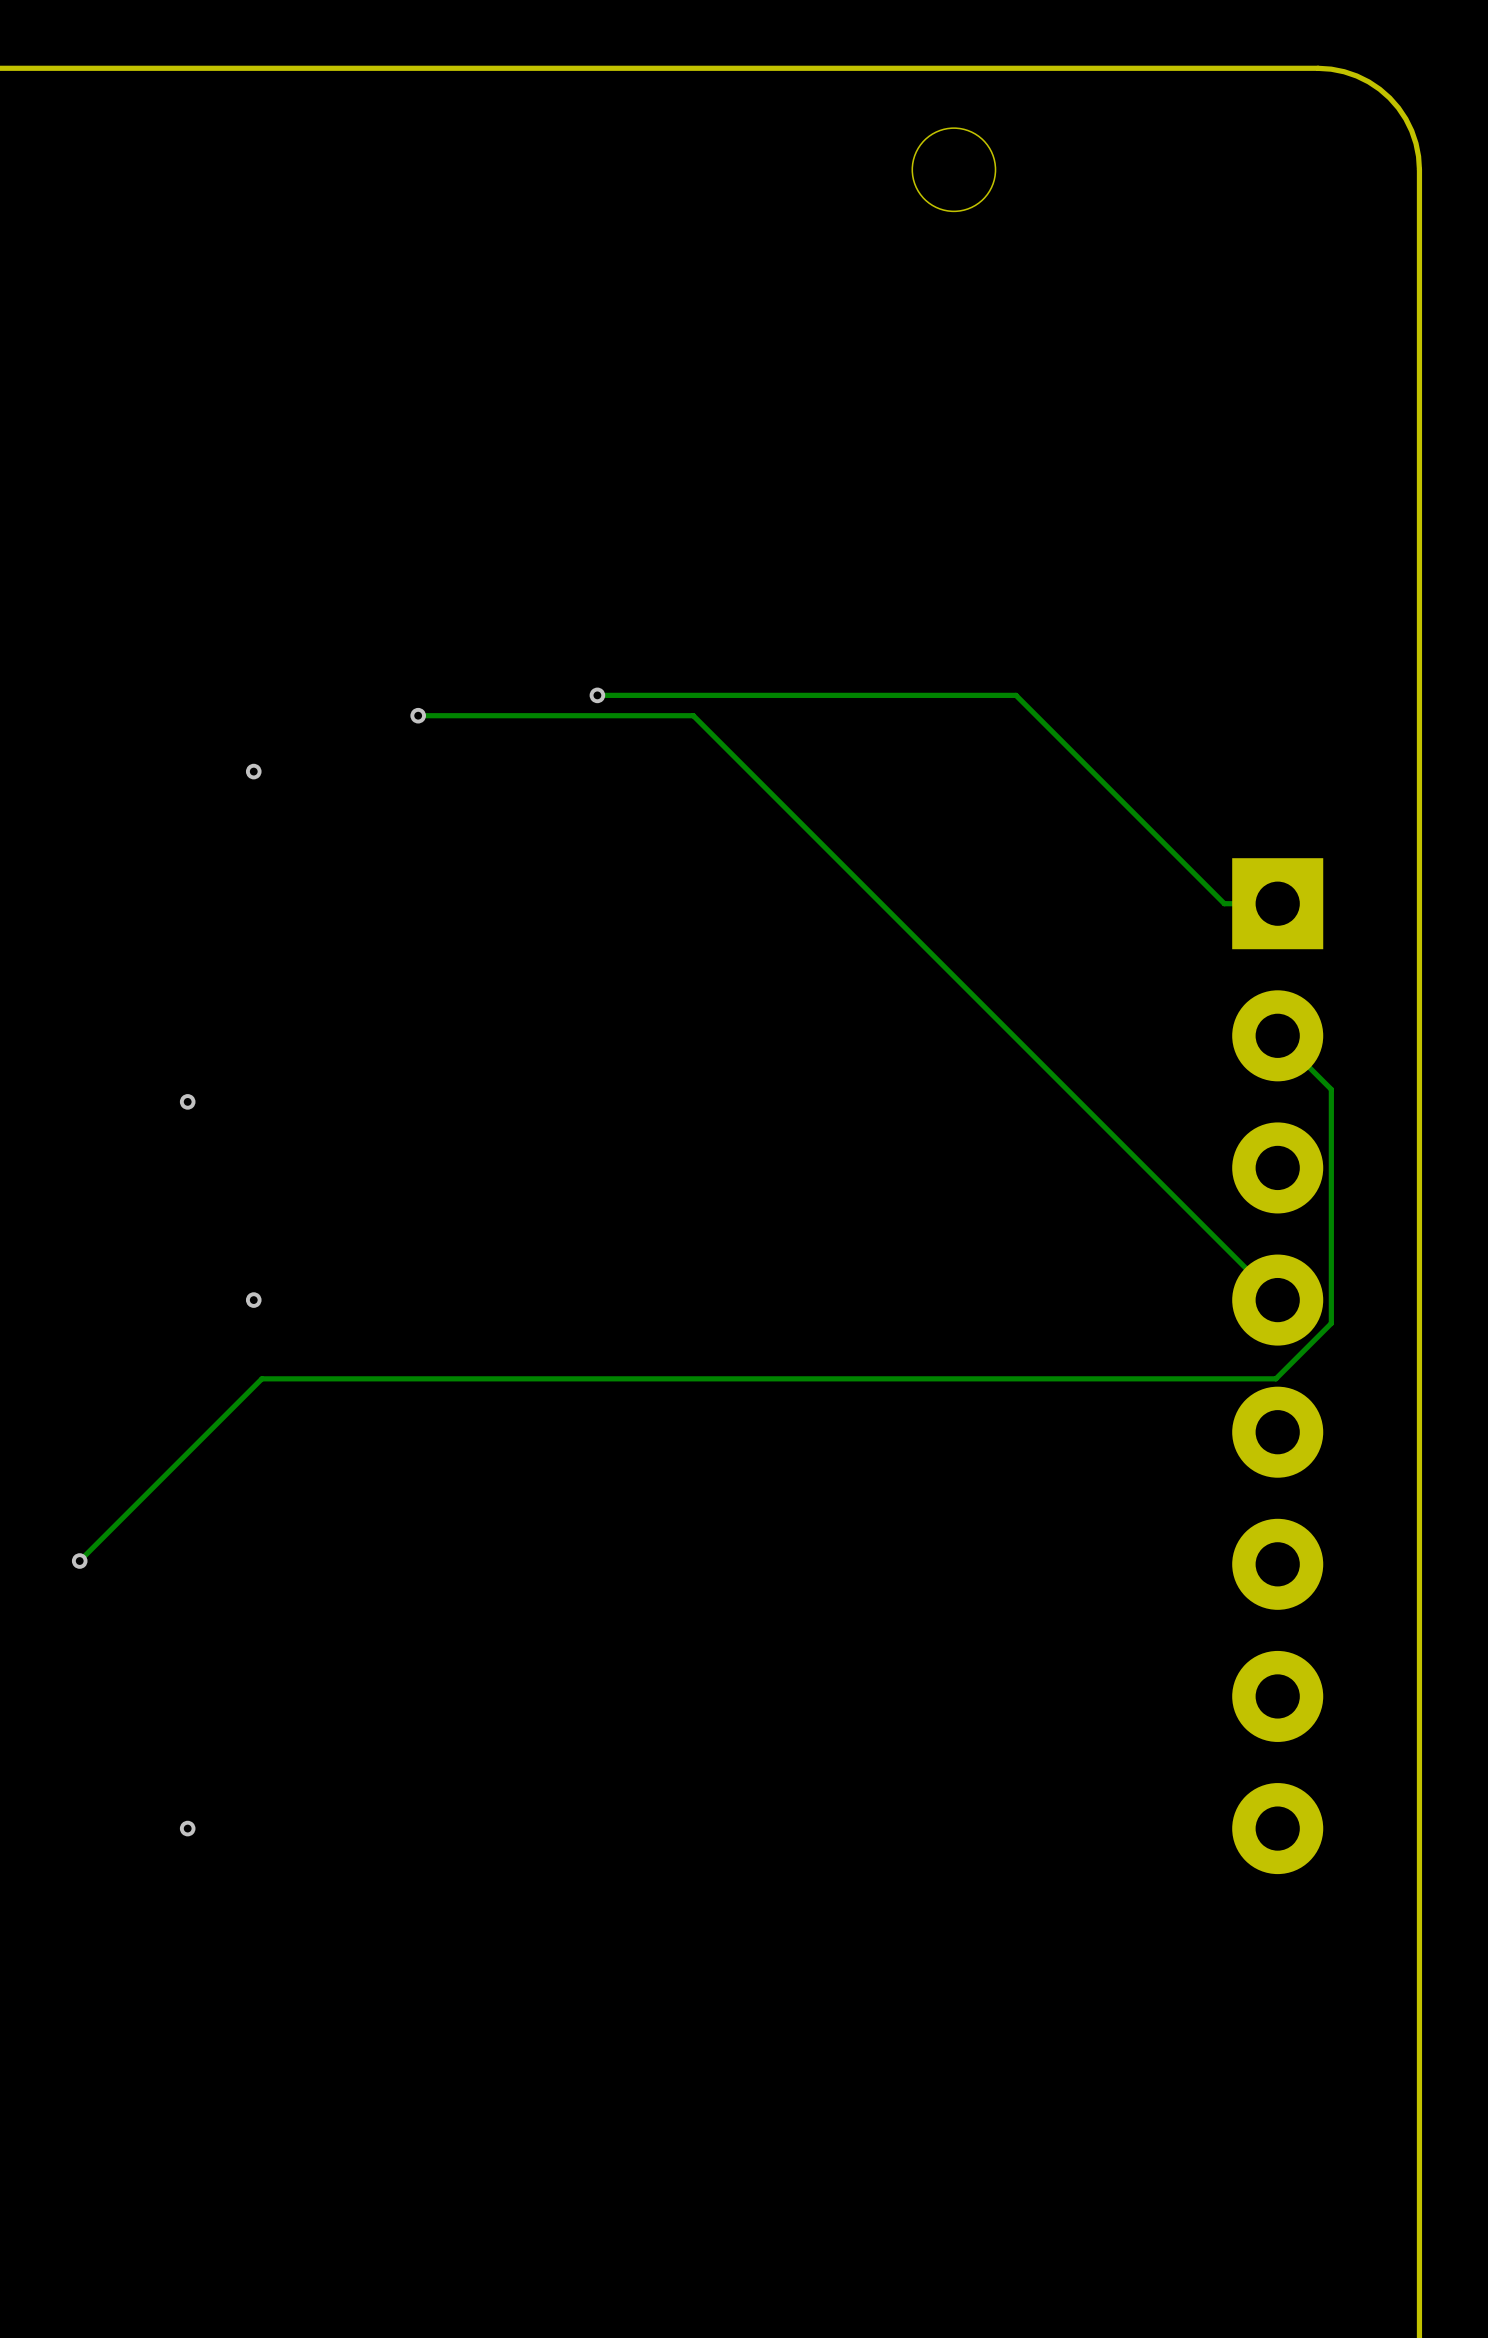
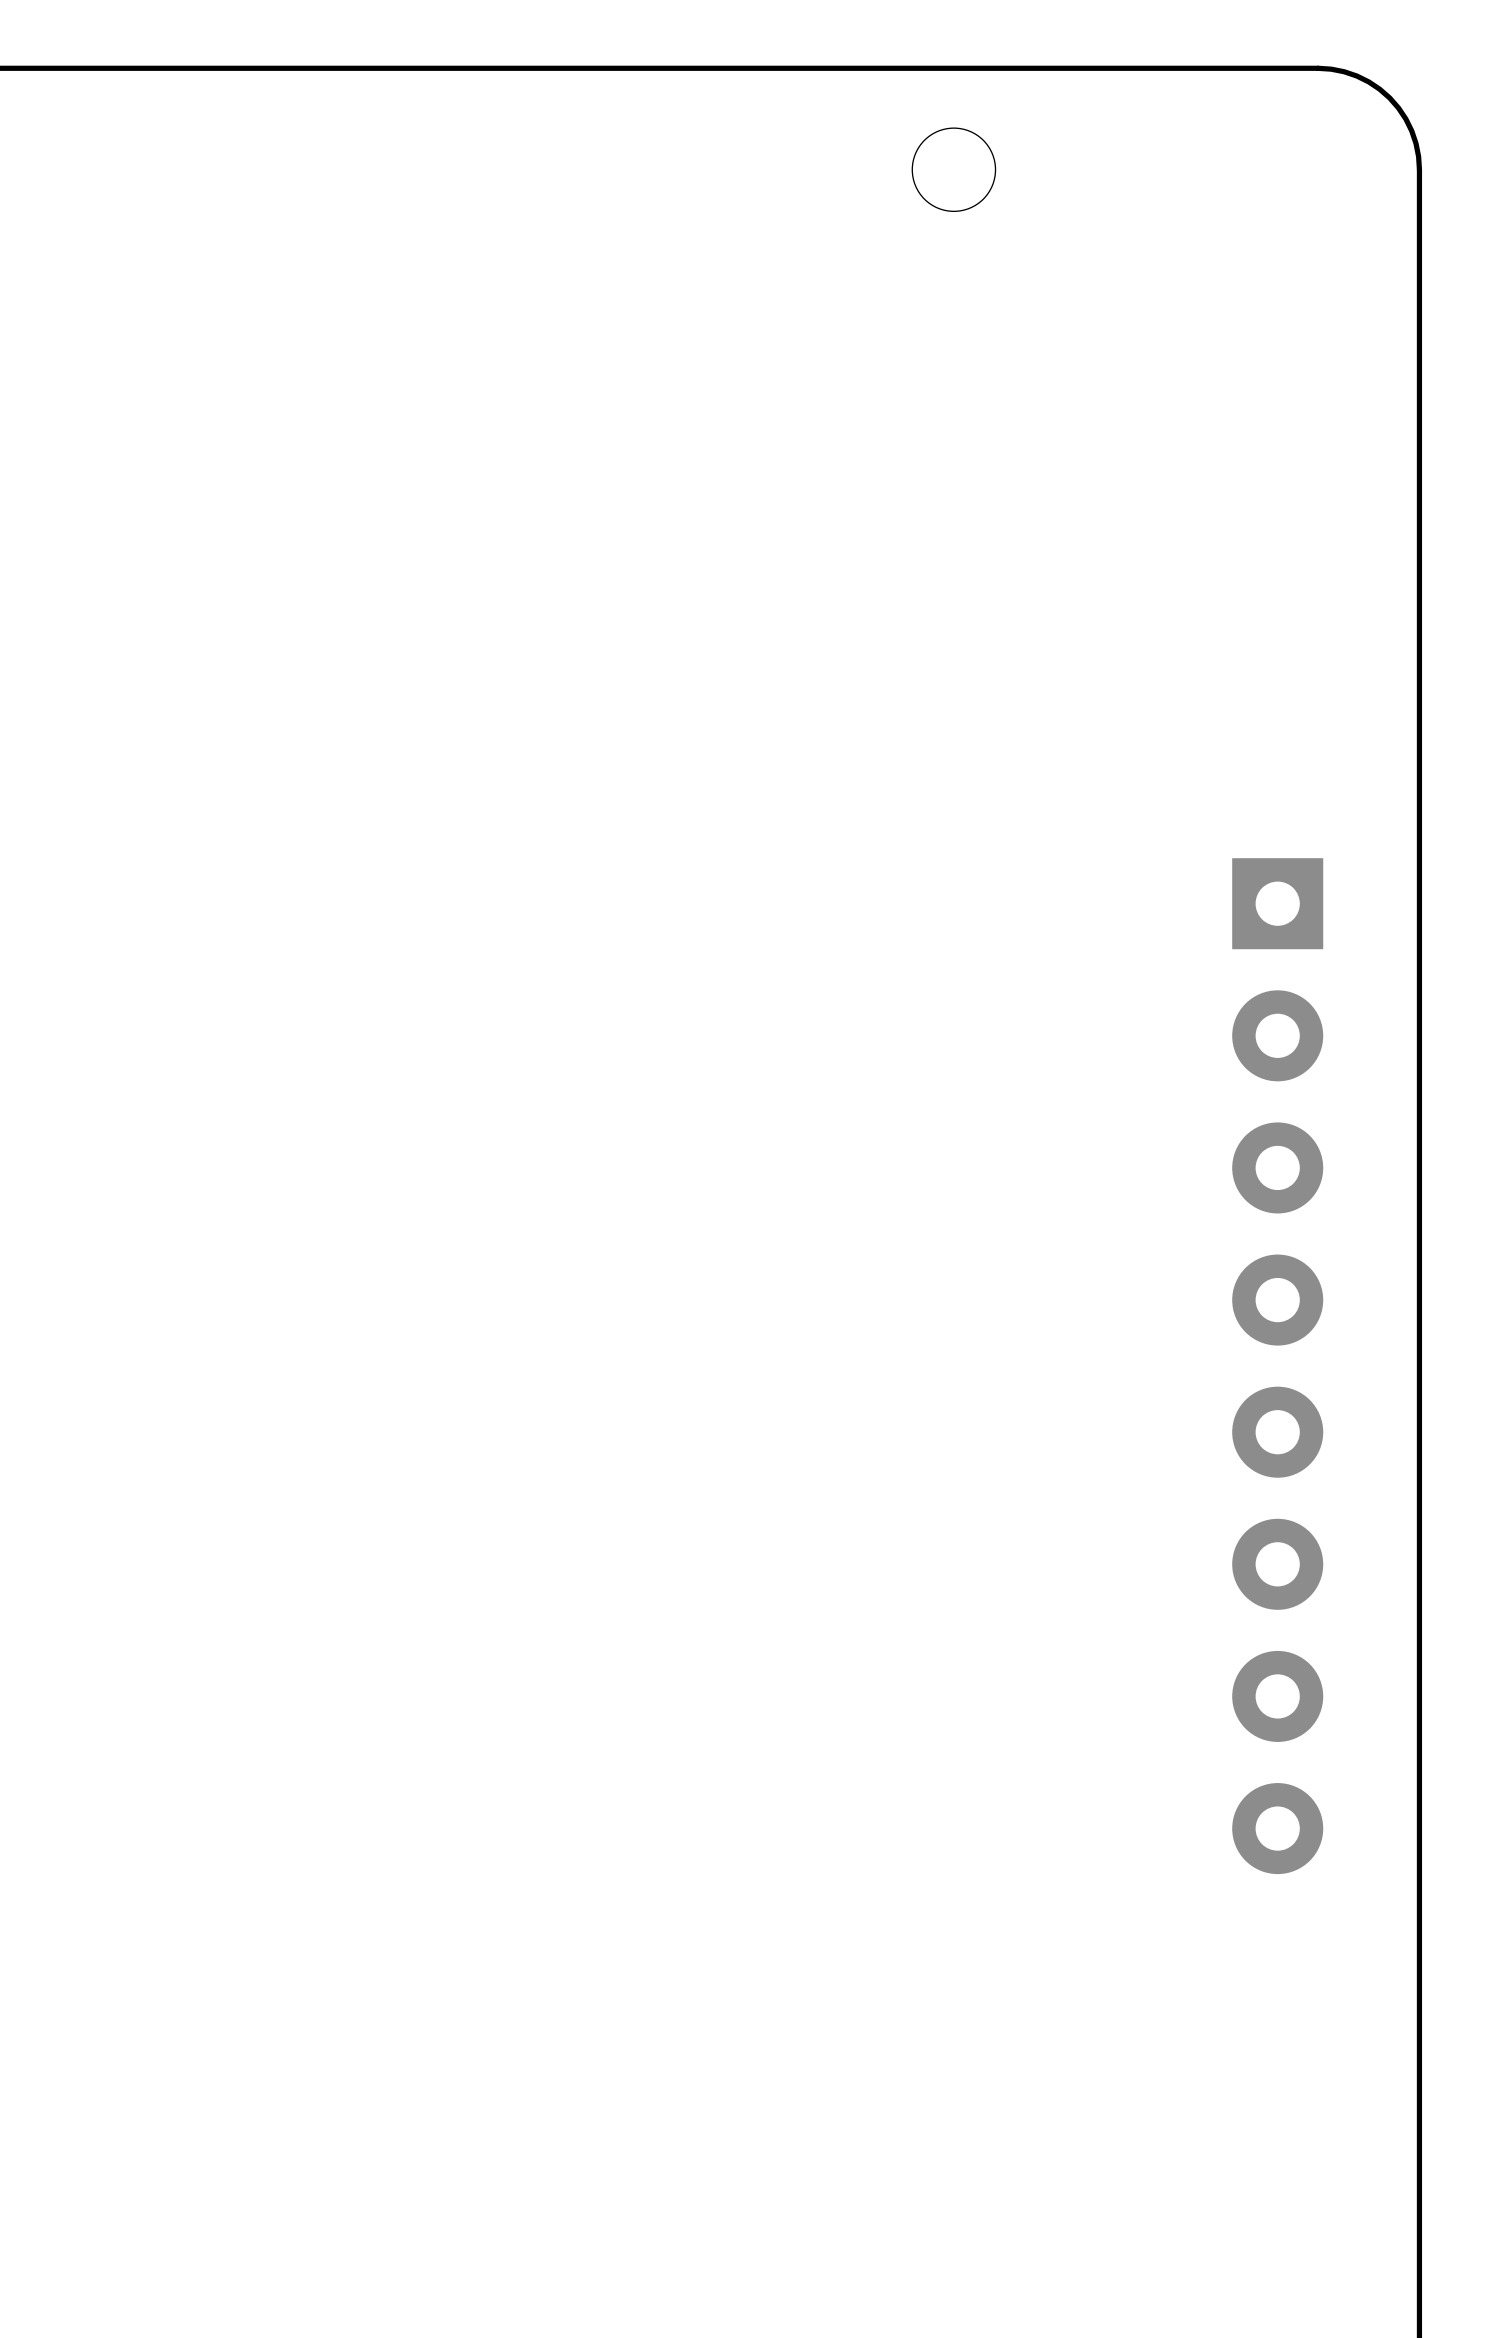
track: (597, 695) (1016, 695) (1224, 903) (1277, 903) -> none
via: (597, 695) -> none
track: (418, 715) (693, 715) (1277, 1300) -> none
via: (418, 715) -> none
via: (253, 771) -> none
track: (1277, 1035) (1331, 1089) (1331, 1323) (1275, 1378) (261, 1378) (79, 1561) -> none
via: (187, 1101) -> none
via: (253, 1300) -> none
via: (79, 1561) -> none
via: (187, 1828) -> none

